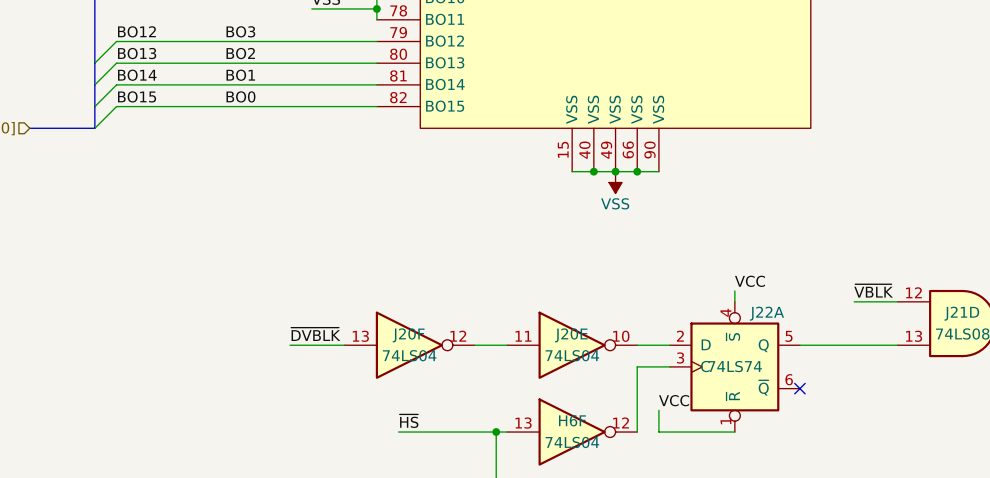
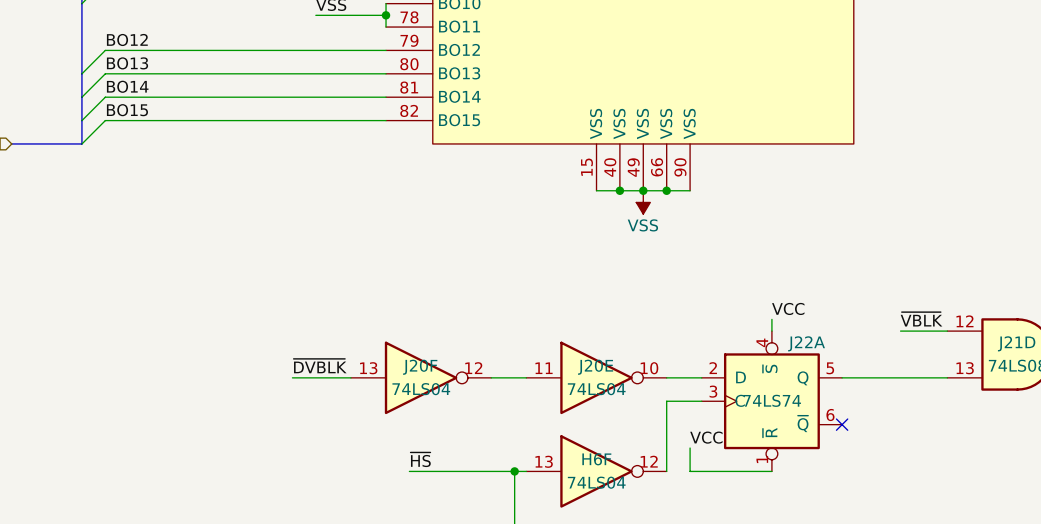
label: BO3 (240, 31) -> none
label: BO2 (240, 53) -> none
label: BO1 (240, 75) -> none
label: BO0 (240, 96) -> none

